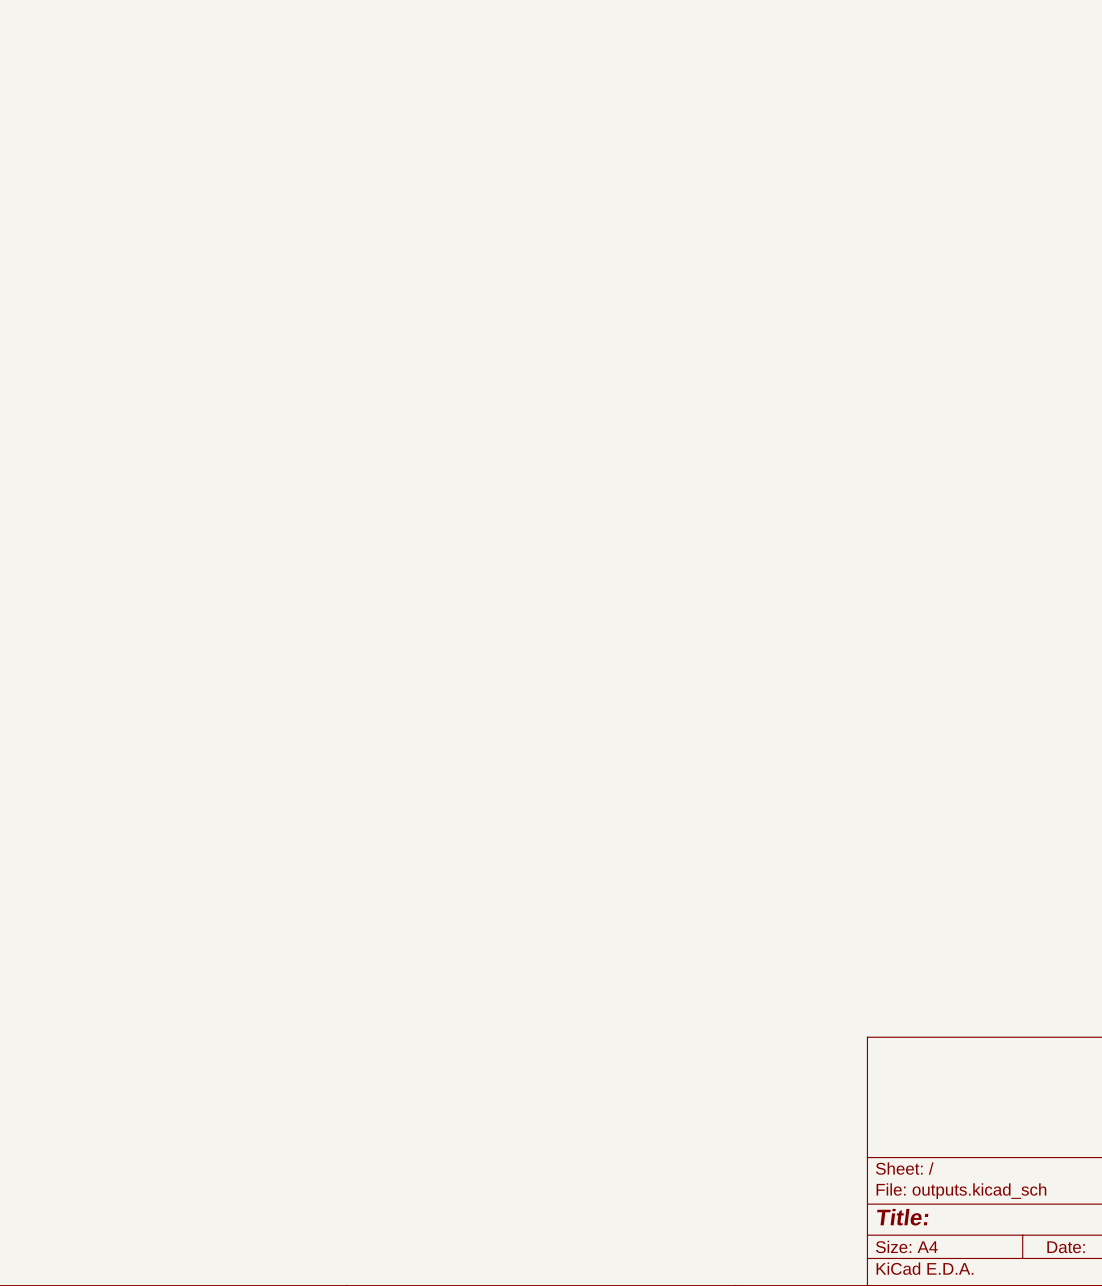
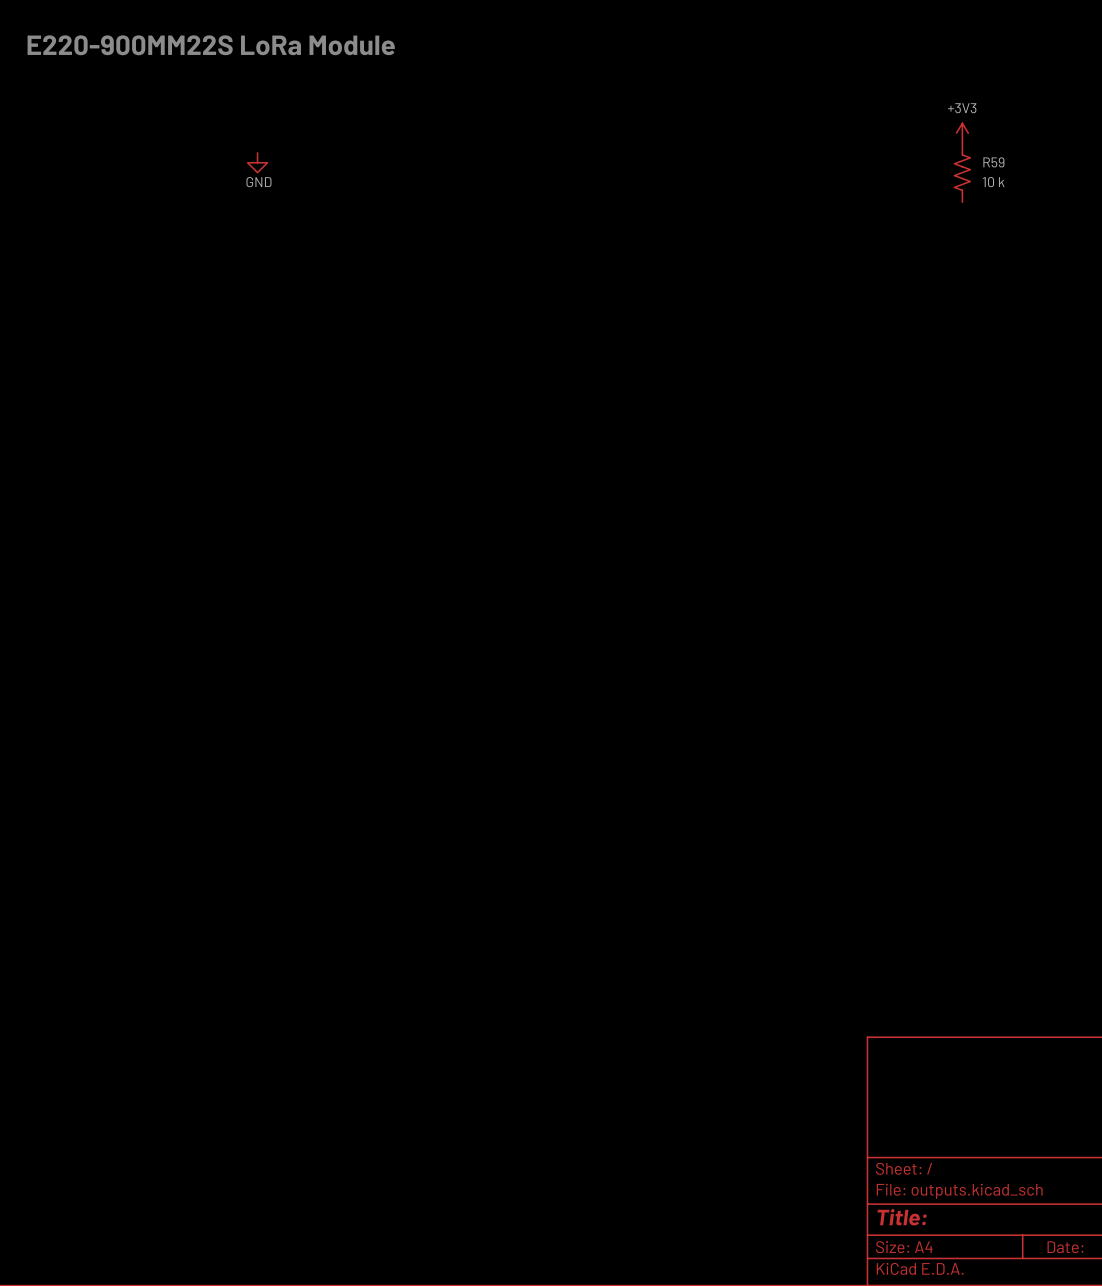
text: none -> E220-900MM22S LoRa Module (211, 45)
power symbol: none -> +3V3 (962, 133)
power symbol: none -> GND (257, 162)
R59: none -> 10 k (962, 172)

